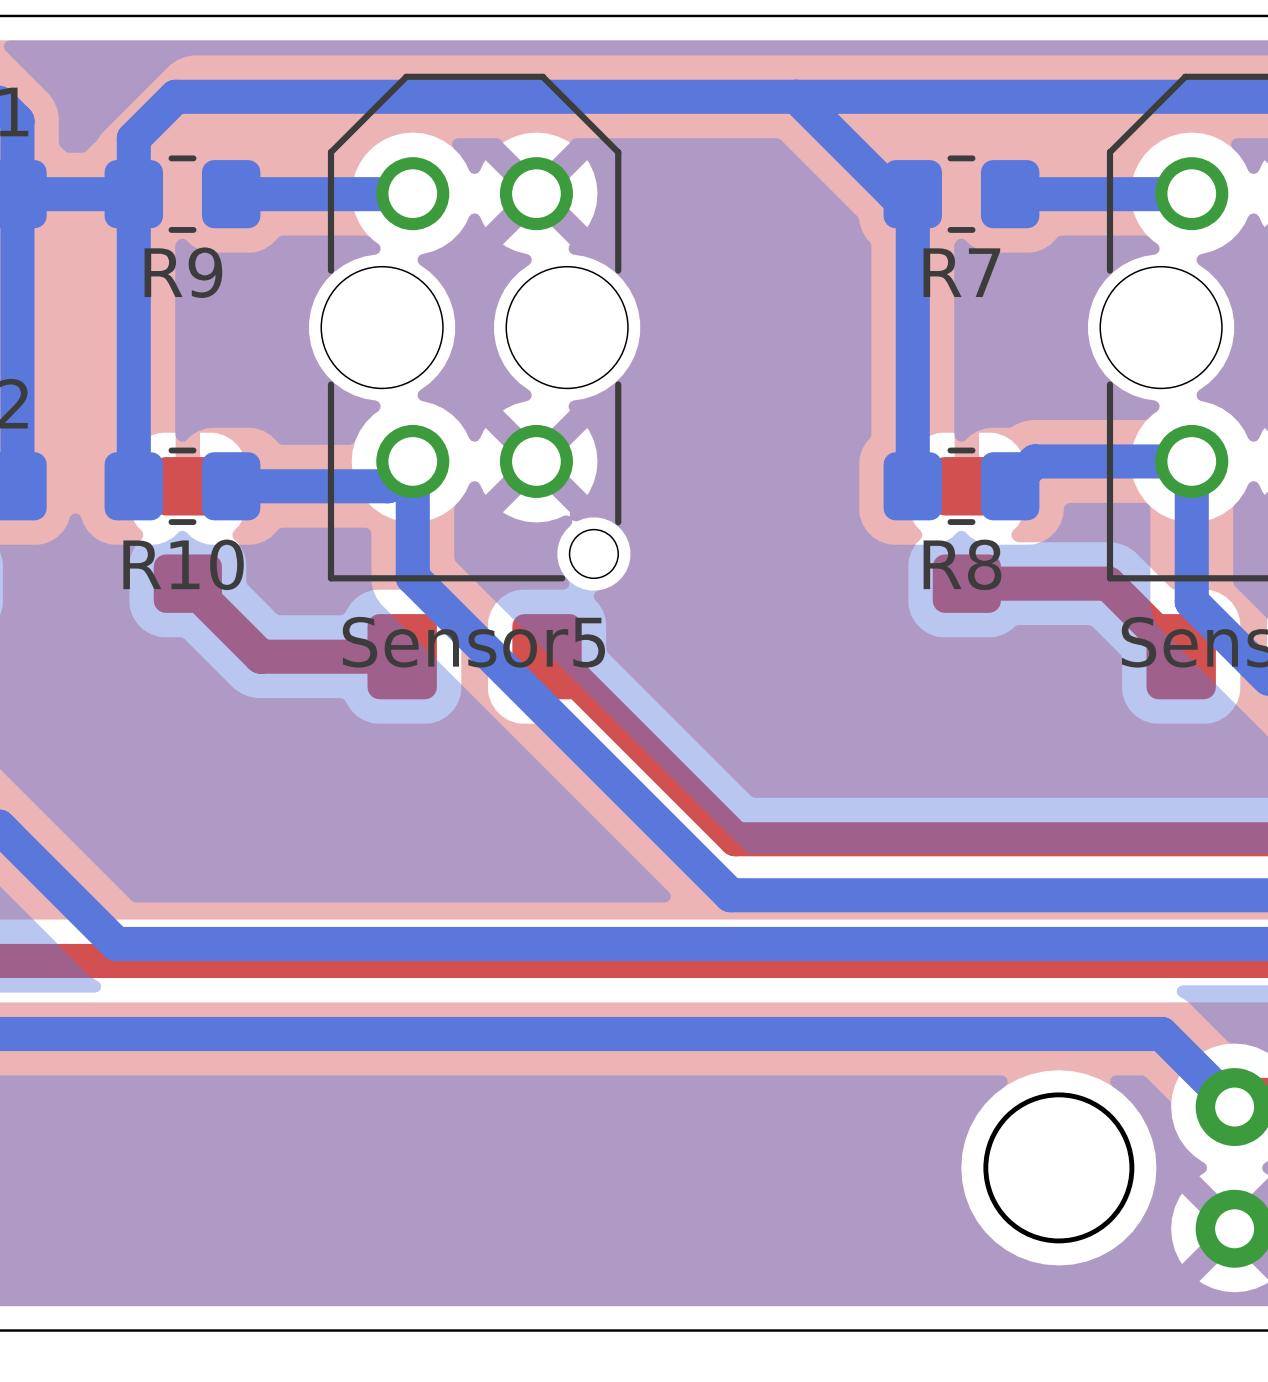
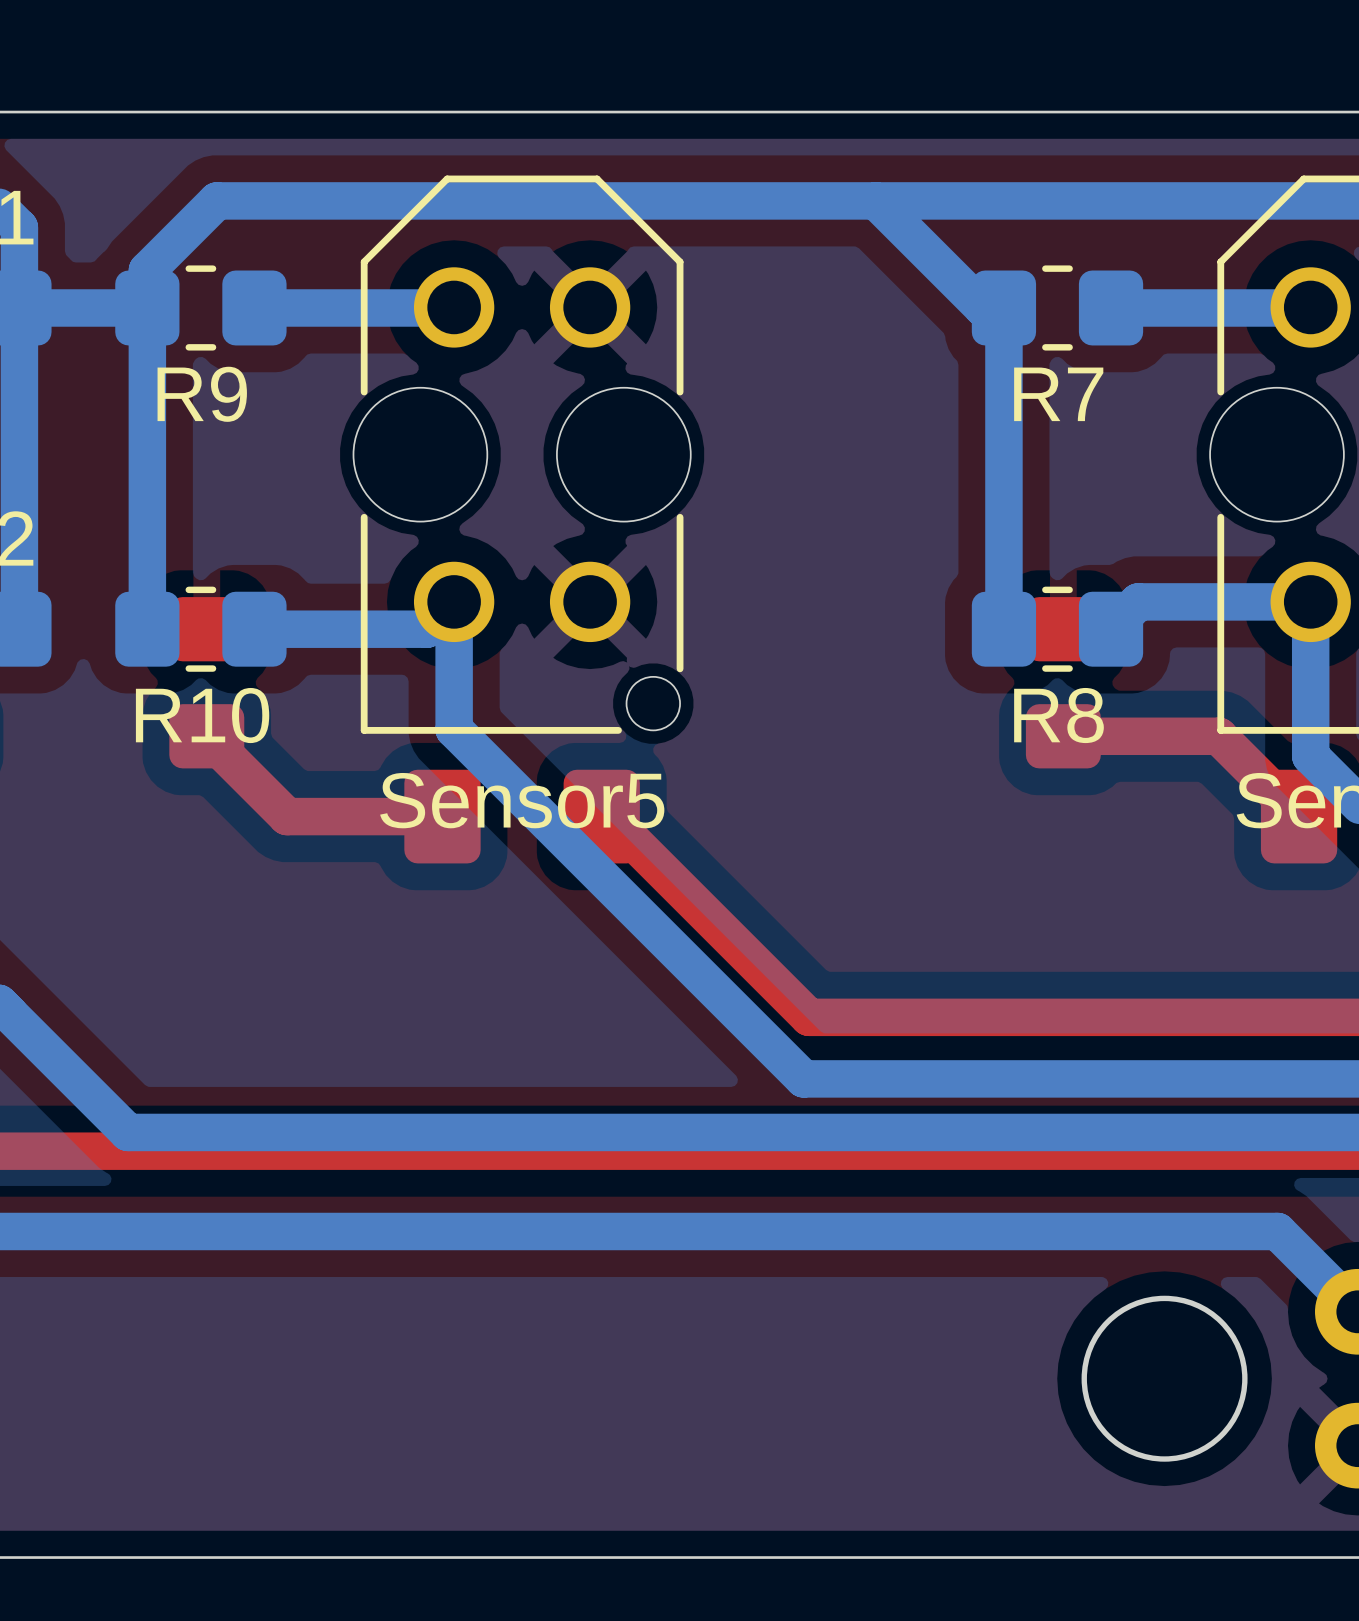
bottom track: (197, 96) (175, 96) (133, 138) (133, 160) -> (216, 200) (147, 270)

